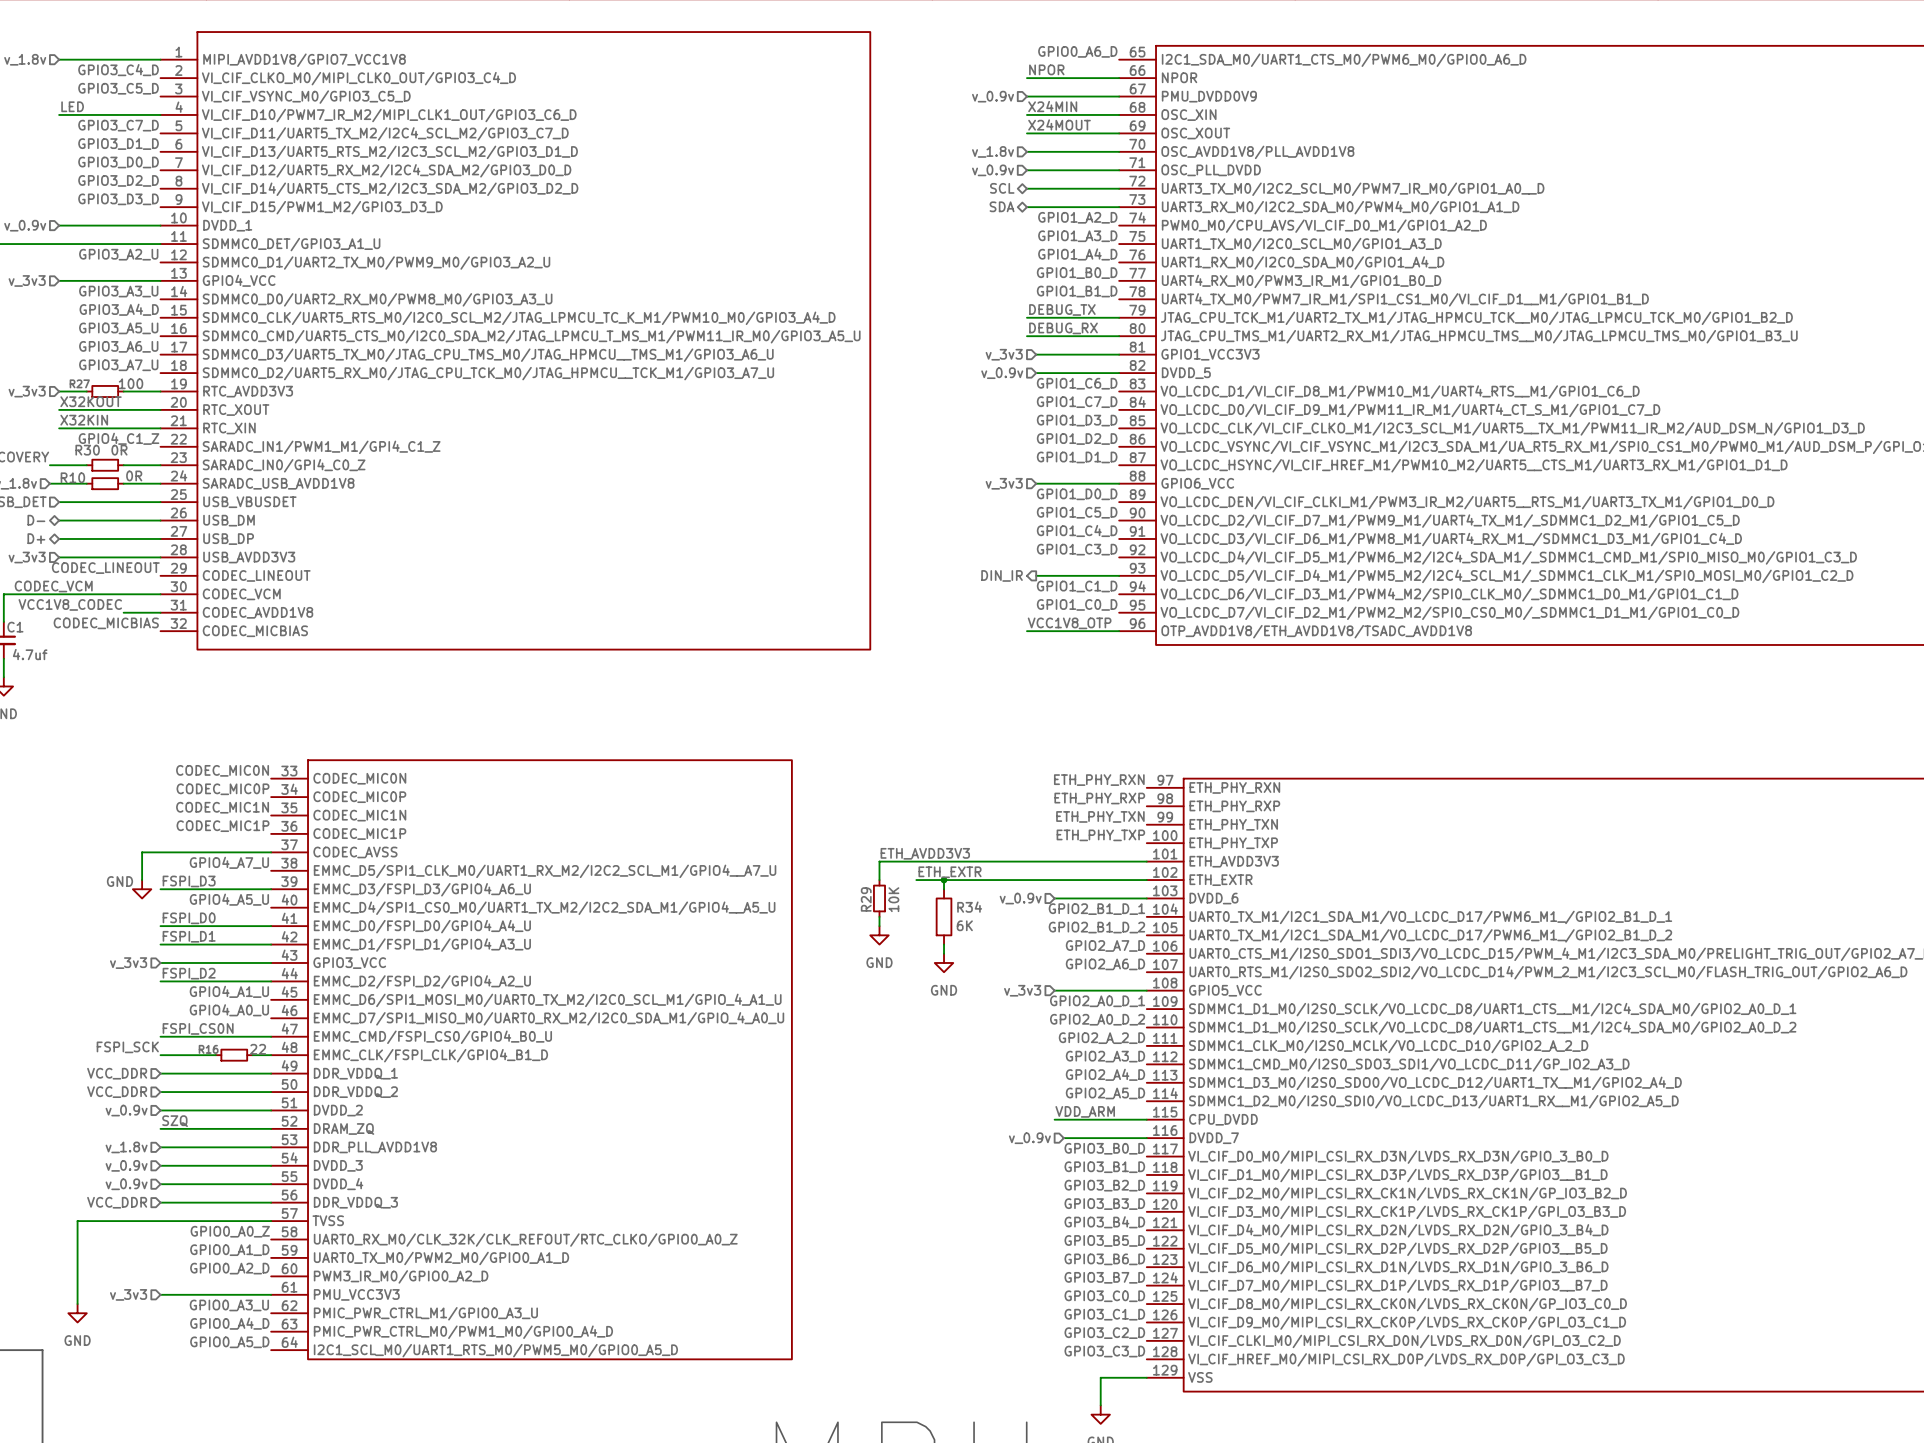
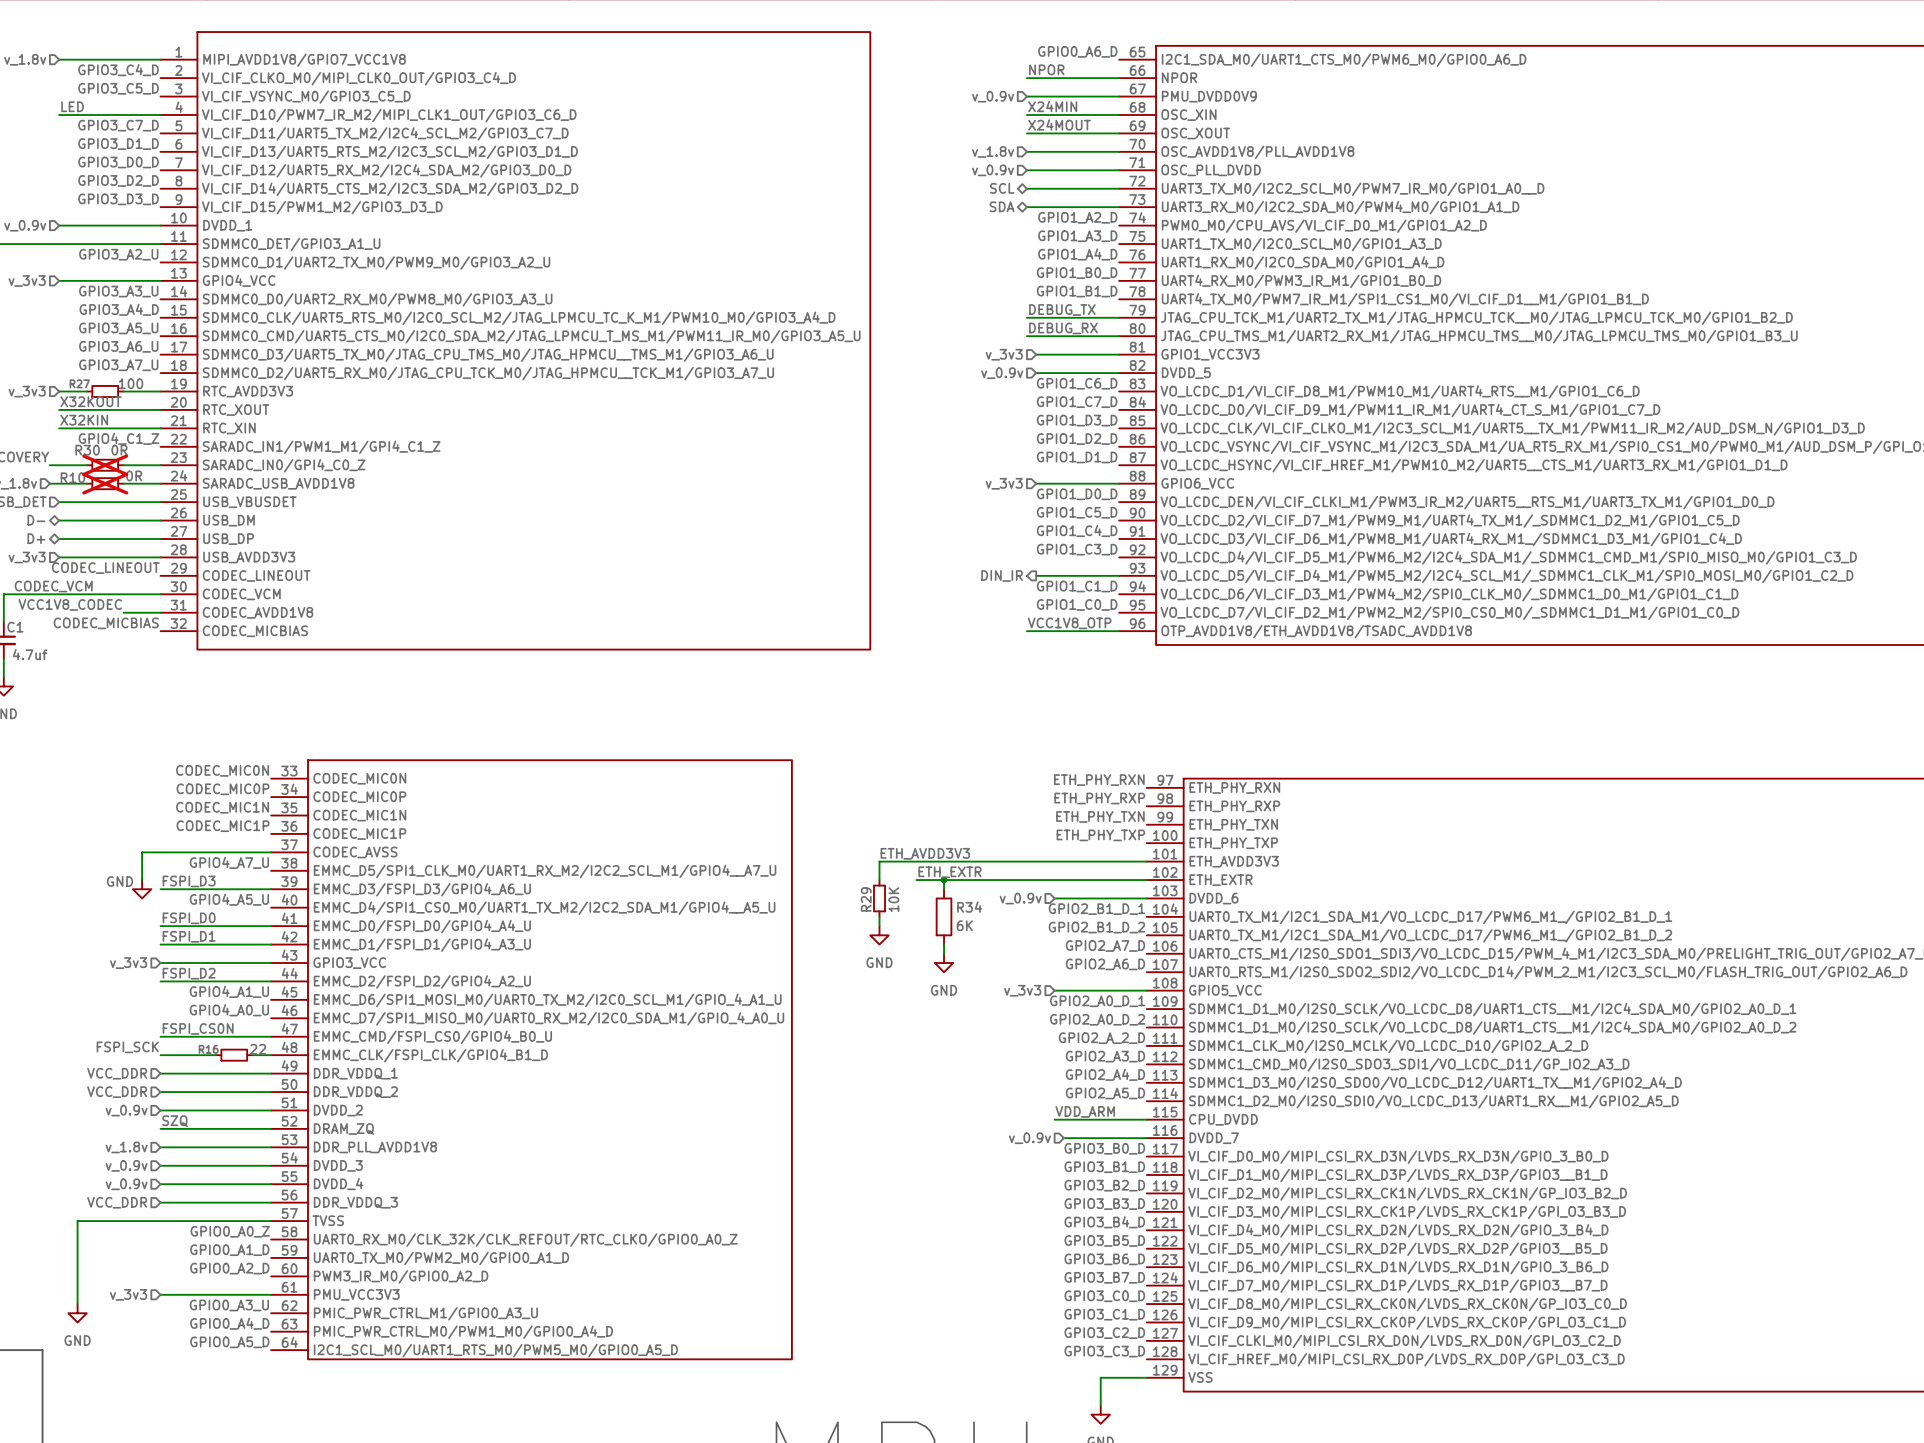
R30 do-not-place cross: none -> (105, 465)
R10 do-not-place cross: none -> (105, 483)

